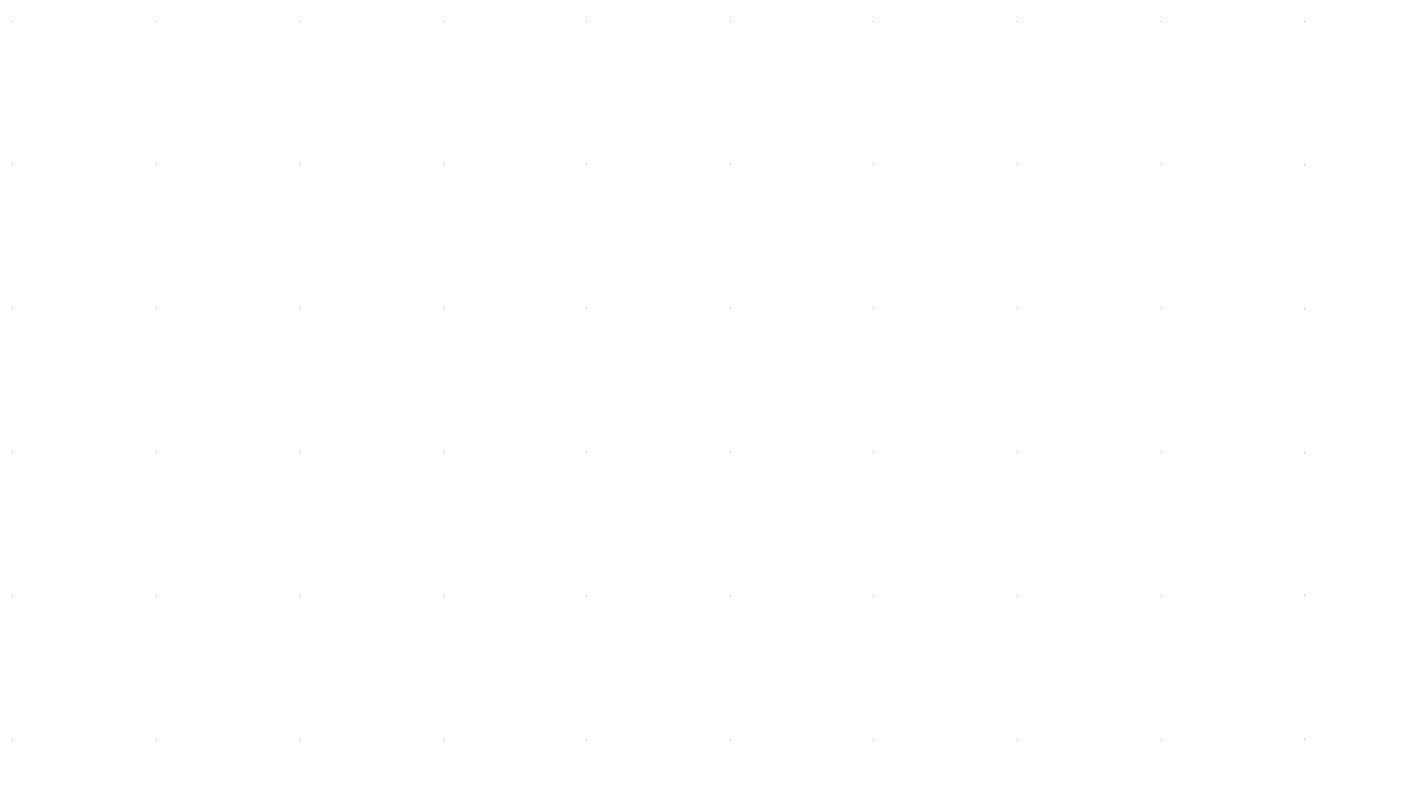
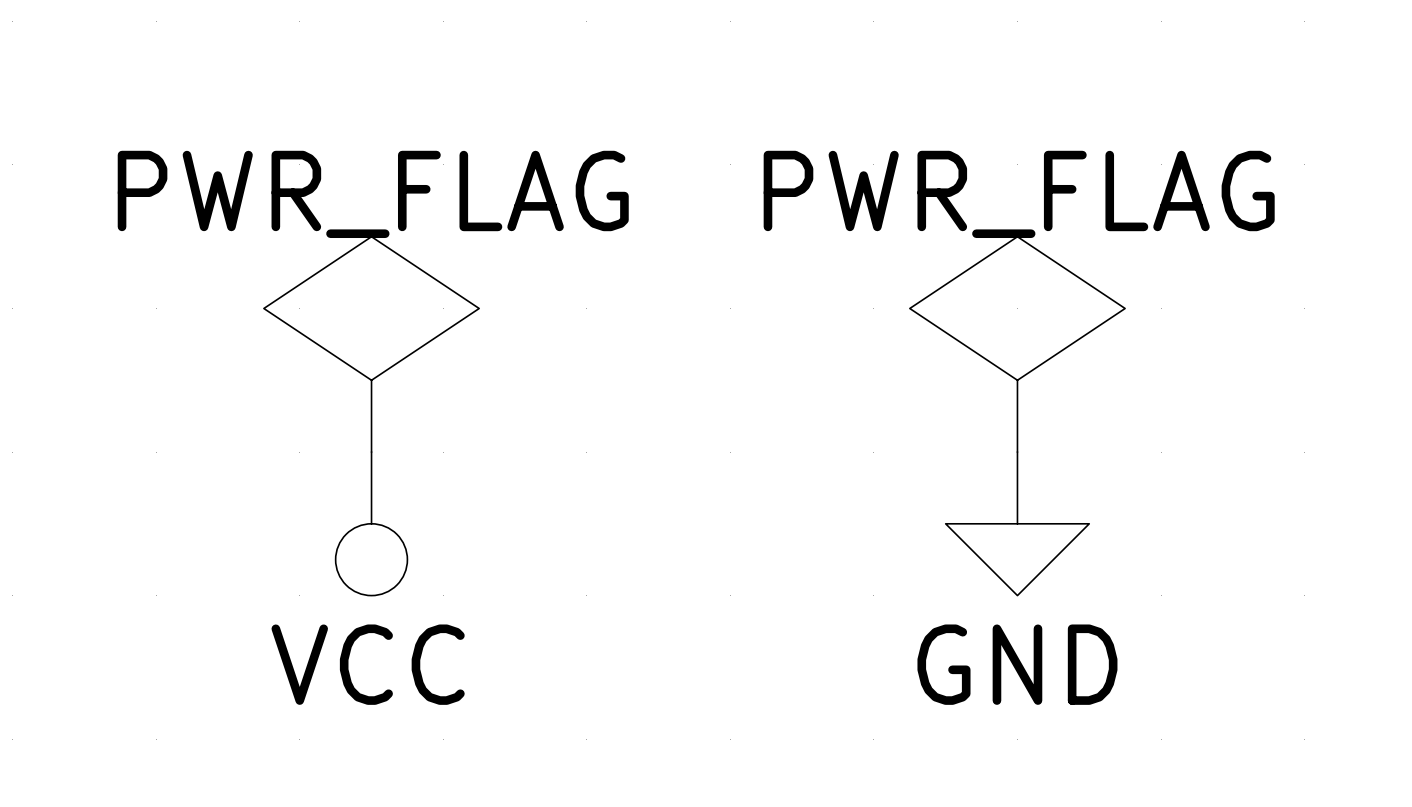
power symbol: none -> PWR_FLAG (371, 344)
power symbol: none -> PWR_FLAG (1017, 344)
power symbol: none -> VCC (371, 523)
power symbol: none -> GND (1017, 523)

